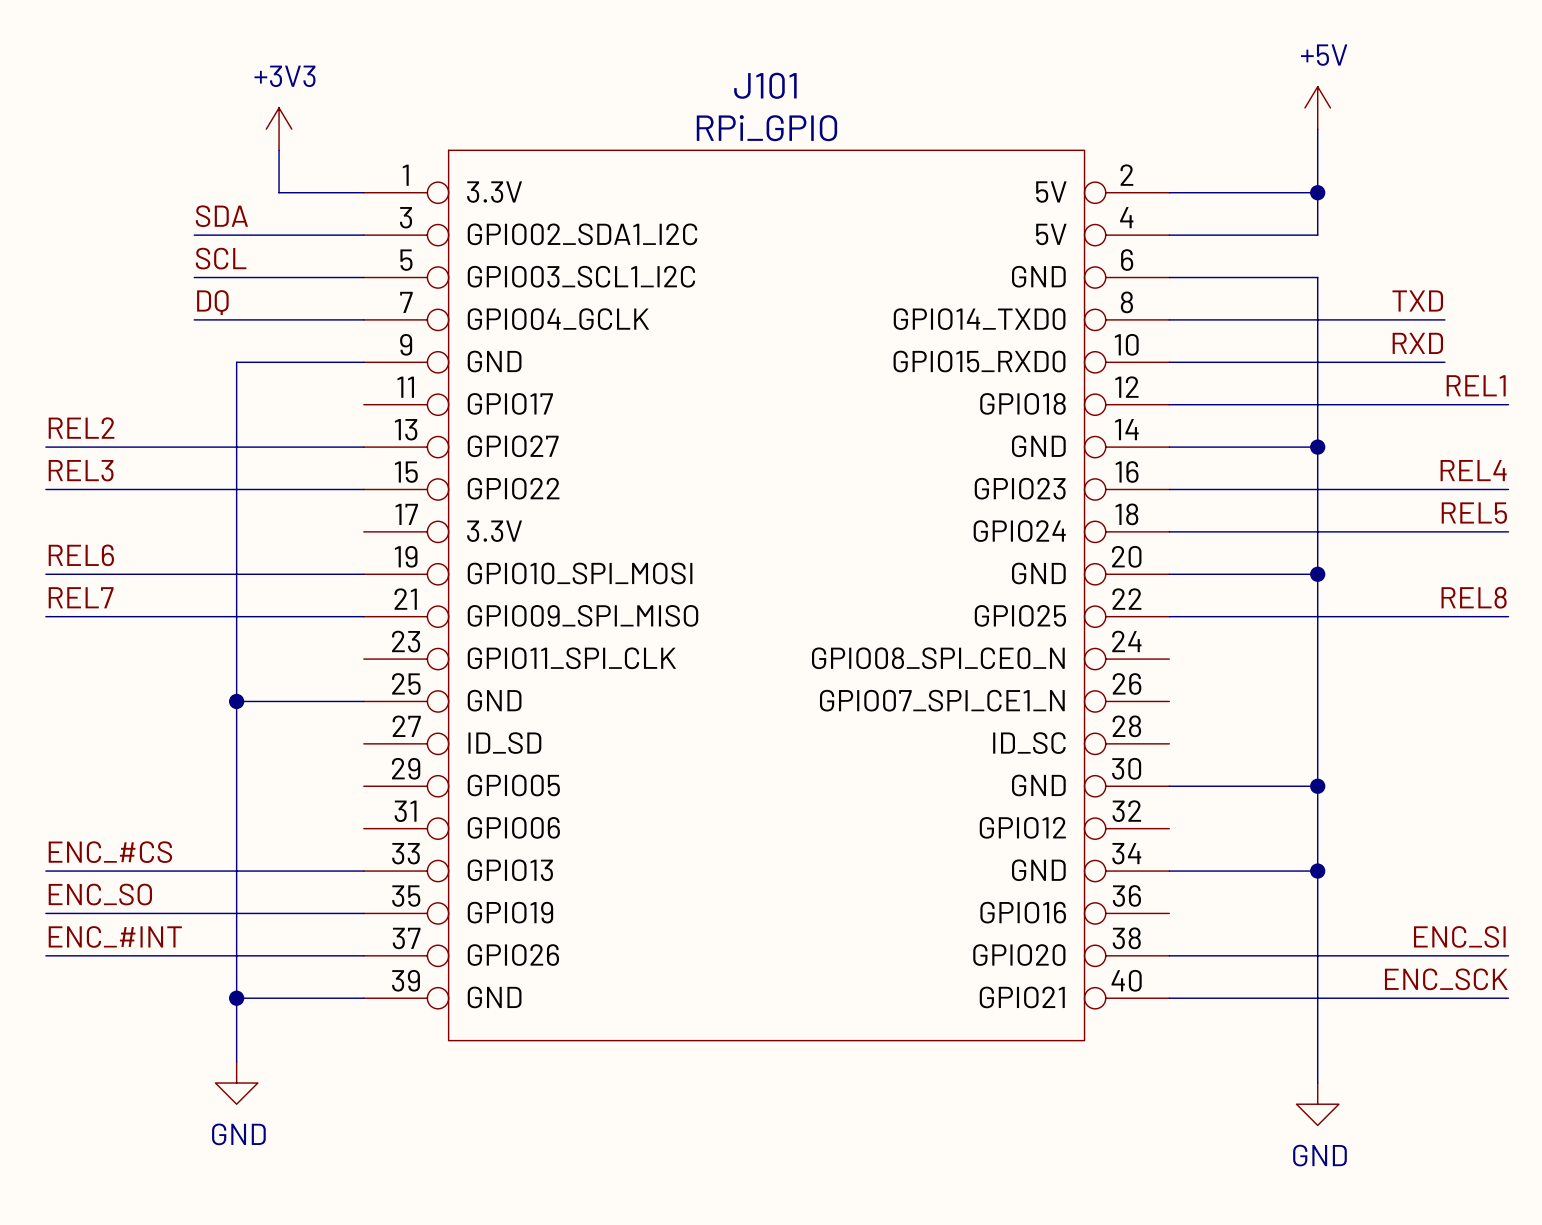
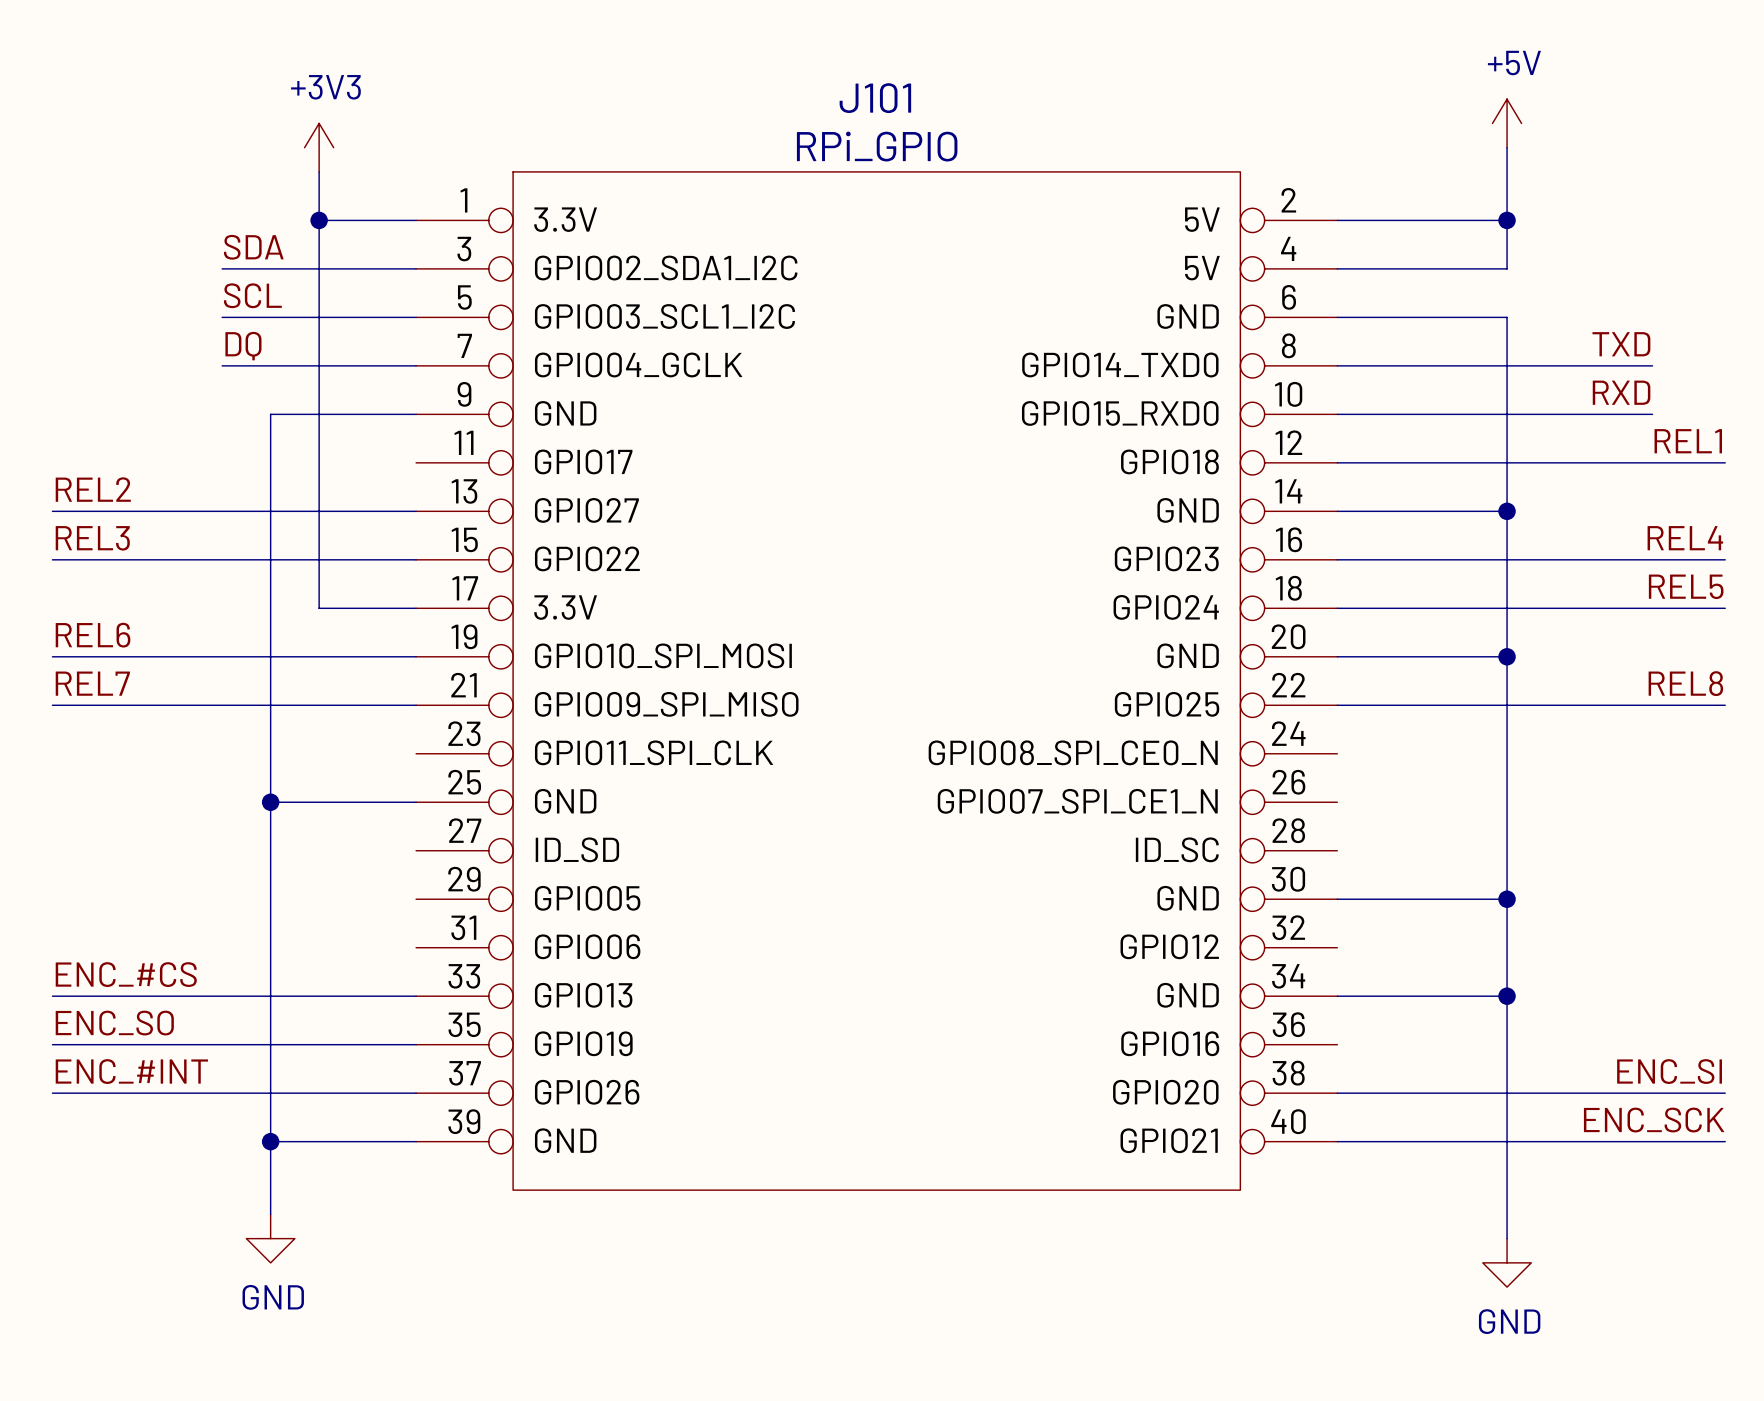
wire: none -> (319, 220) (319, 608) (416, 608)
junction: none -> (319, 220)

